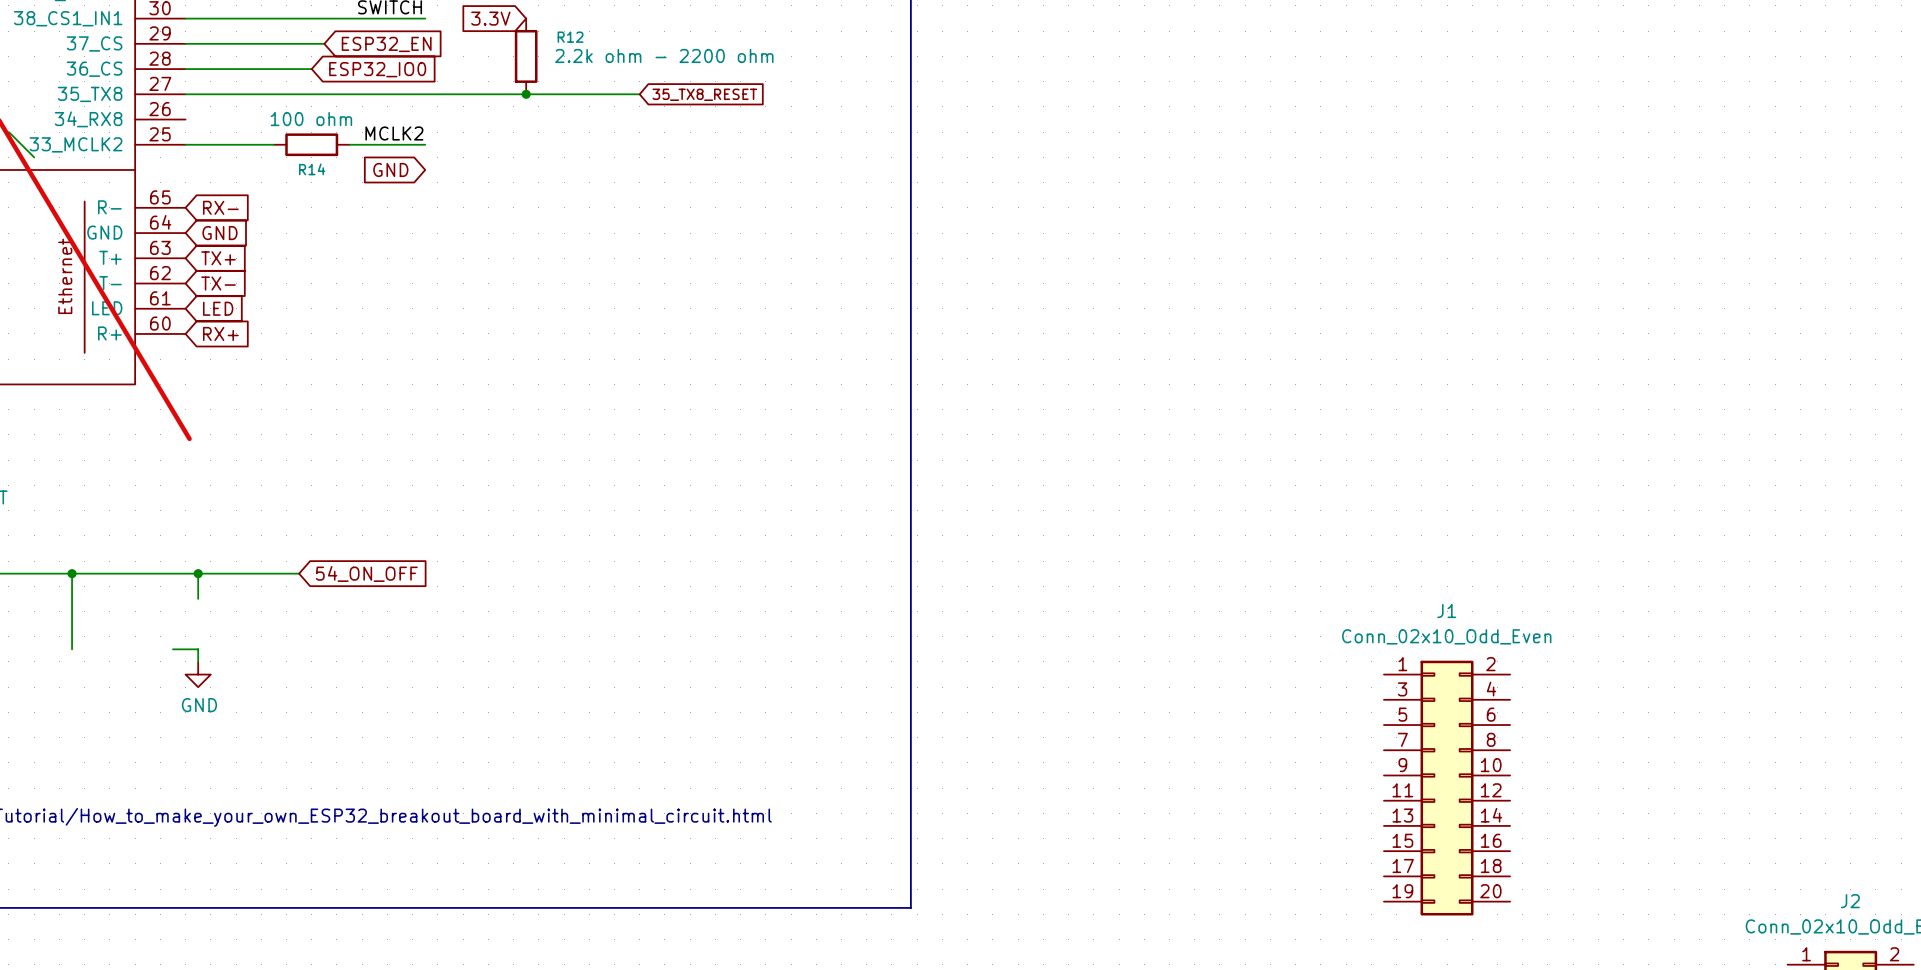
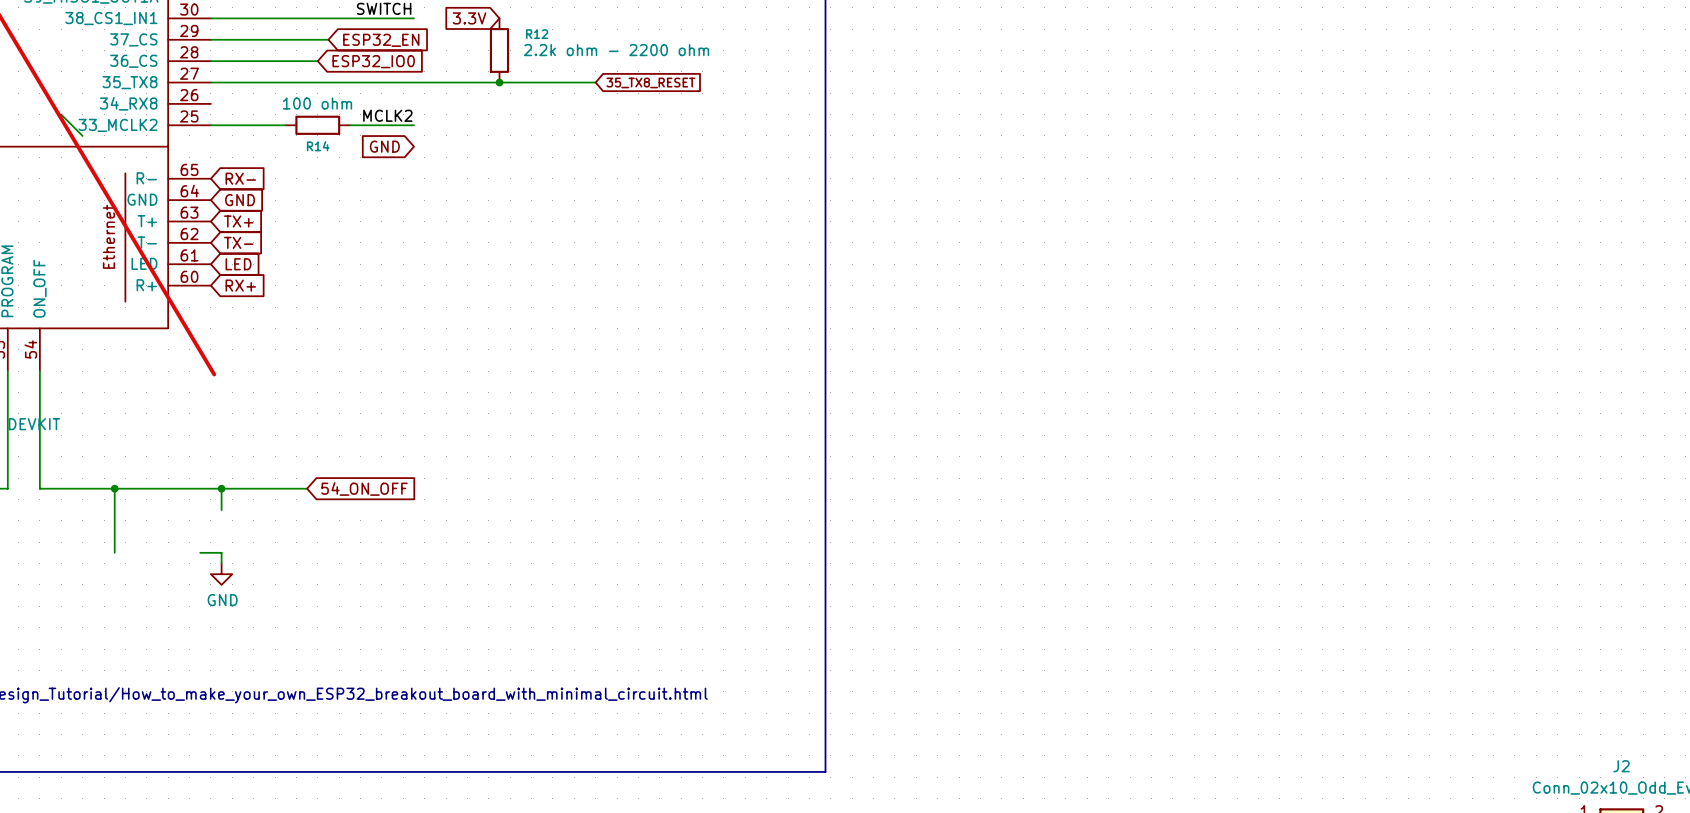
J1: Conn_02x10_Odd_Even (1447, 788) -> none

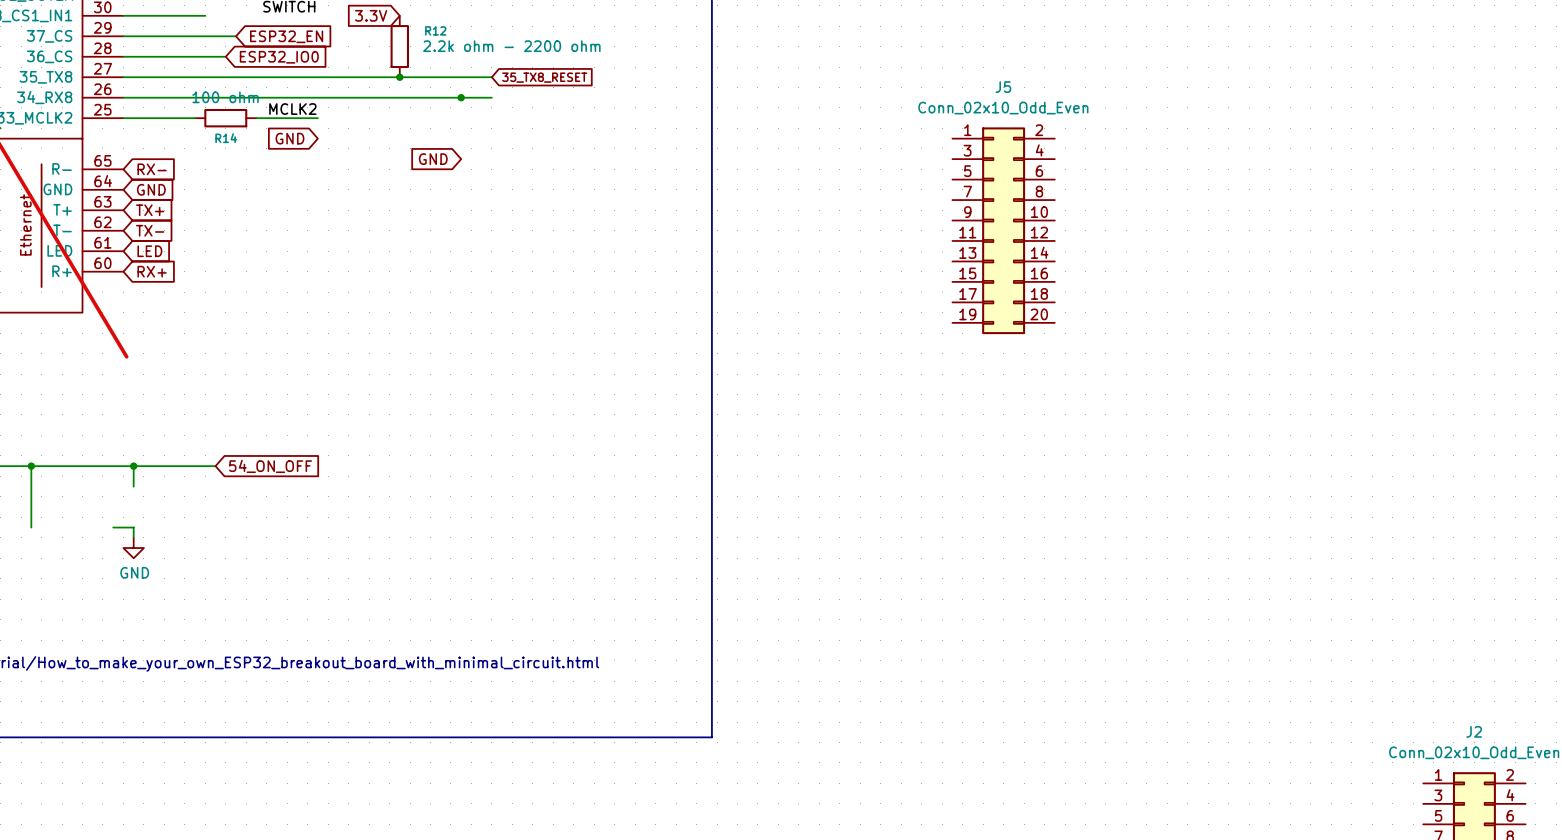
wire: (296, 18) (413, 18) -> none
wire: none -> (123, 97) (491, 97)
junction: none -> (461, 97)
global label: none -> GND (433, 159)
J5: none -> Conn_02x10_Odd_Even (1003, 230)

